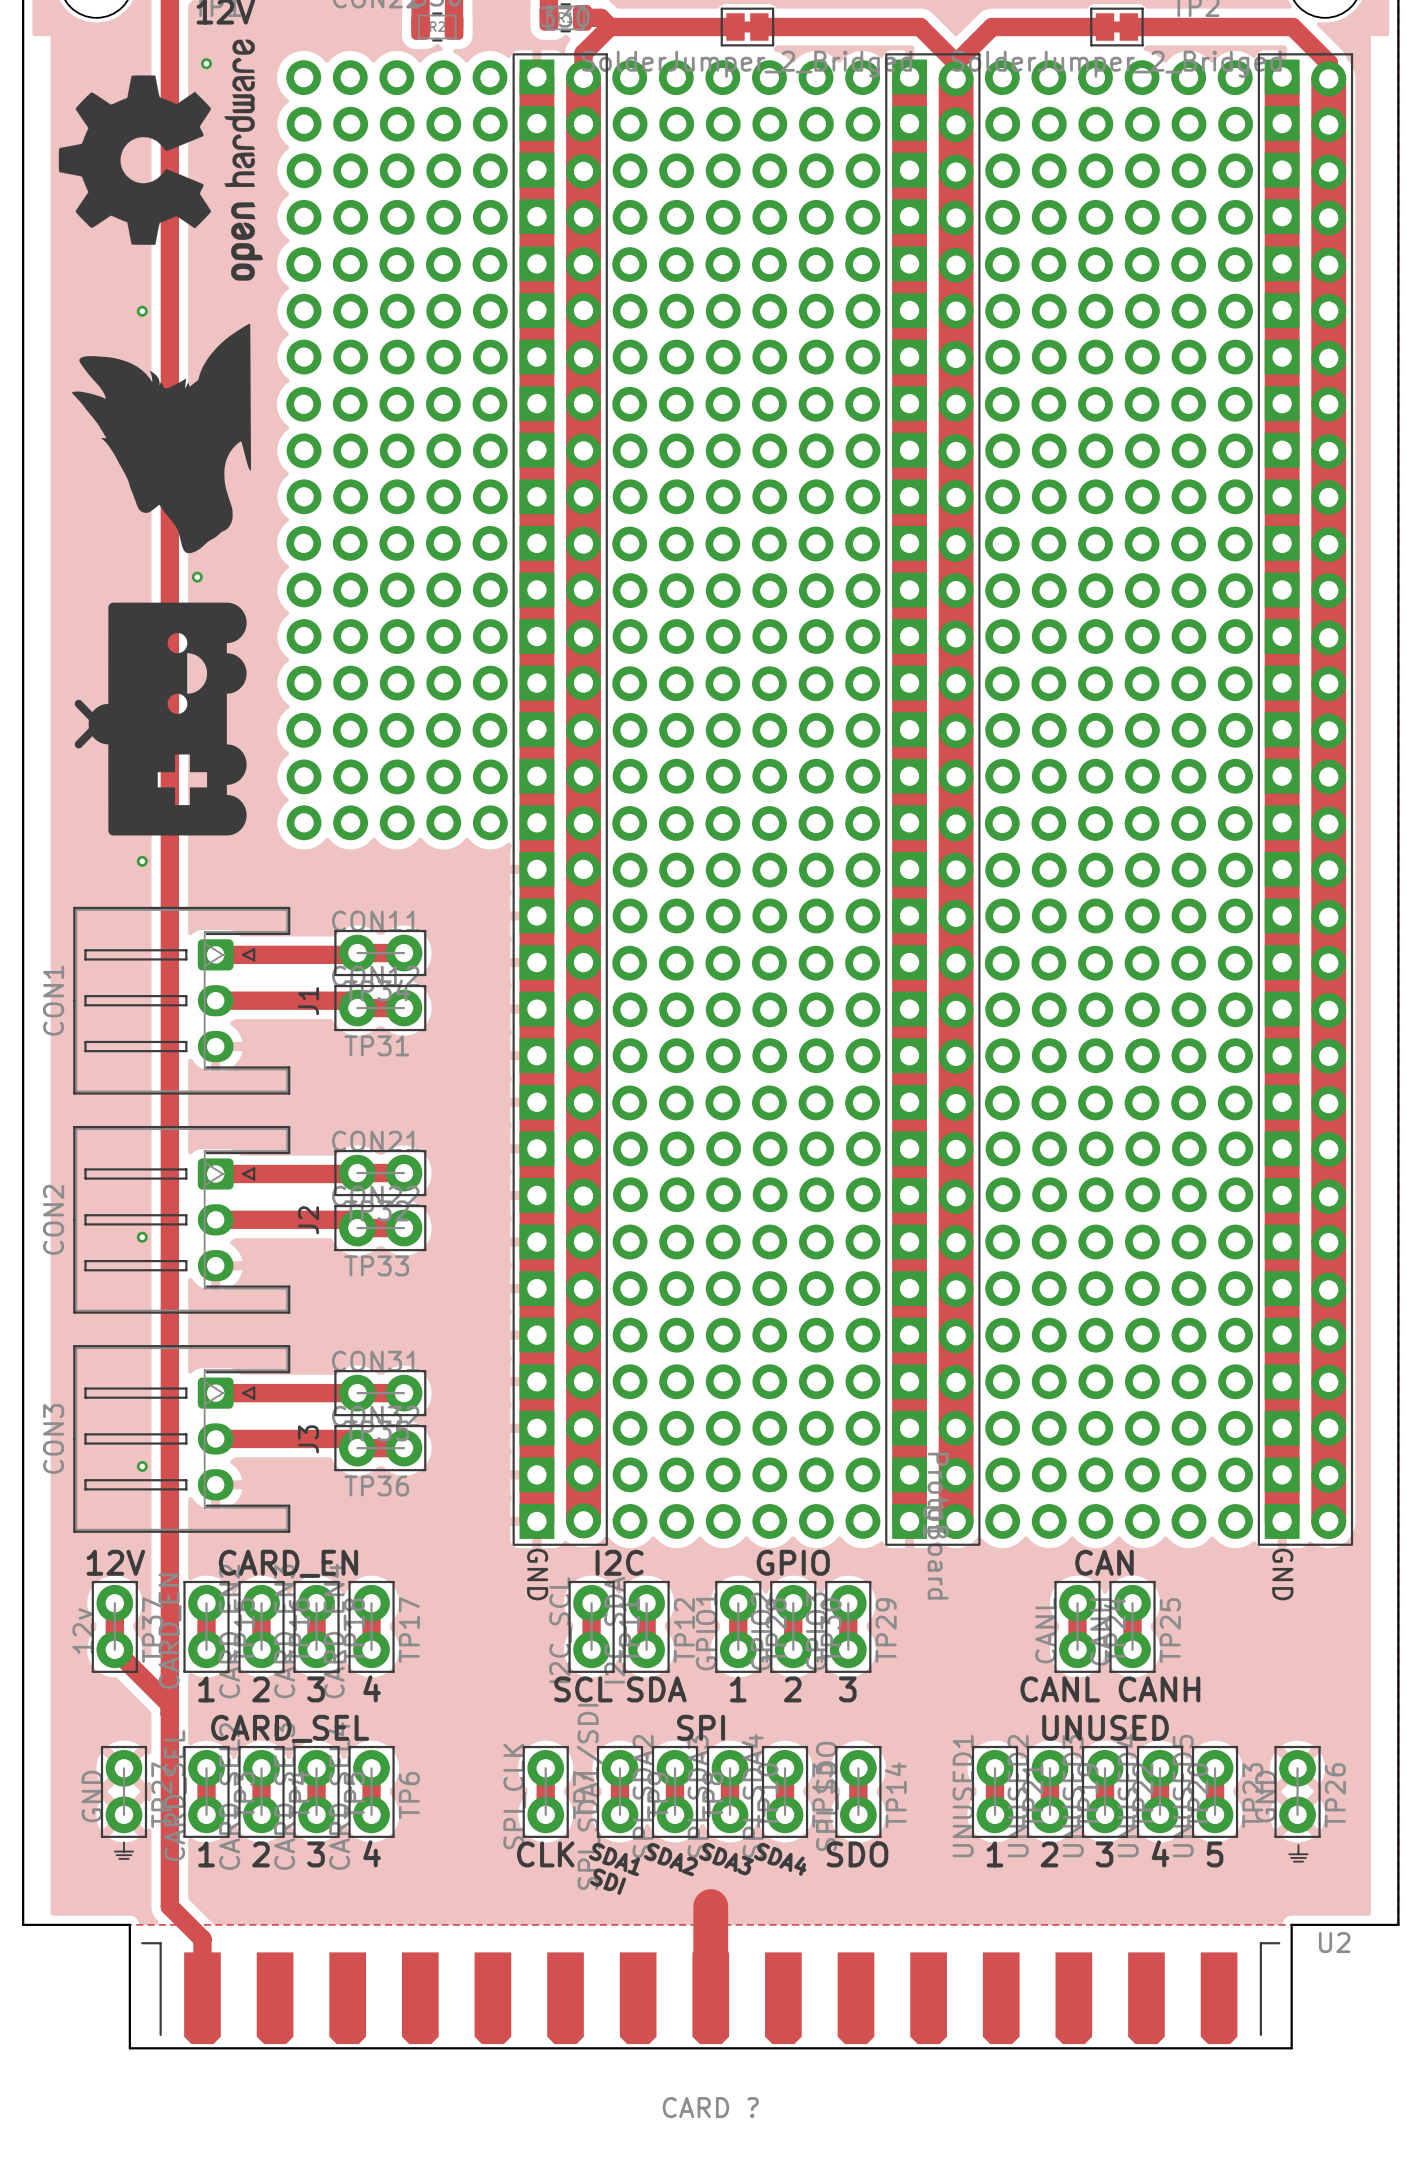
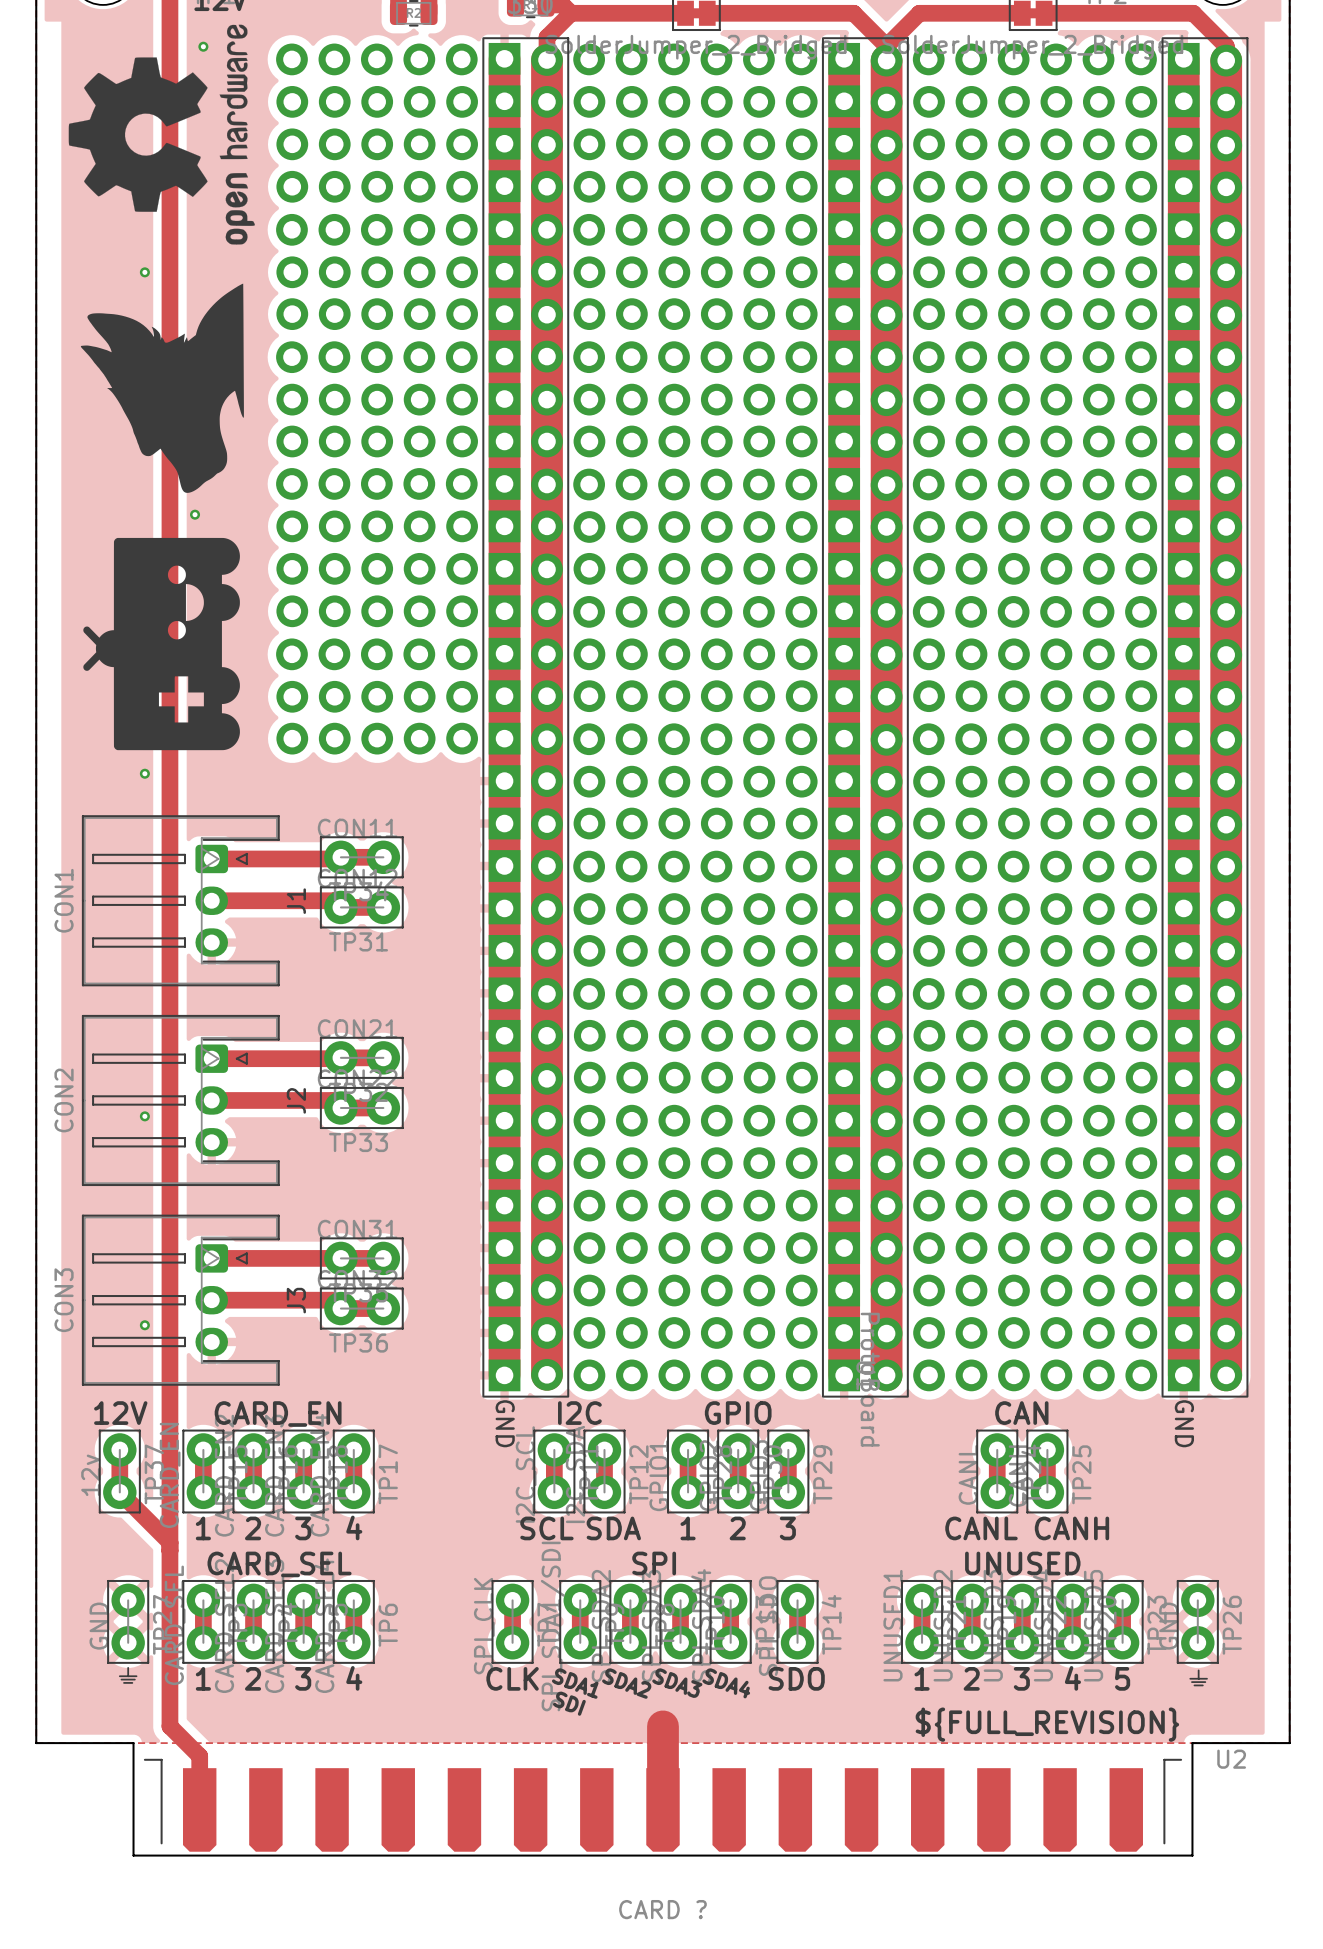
text: none -> ${FULL_REVISION} (1047, 1724)

